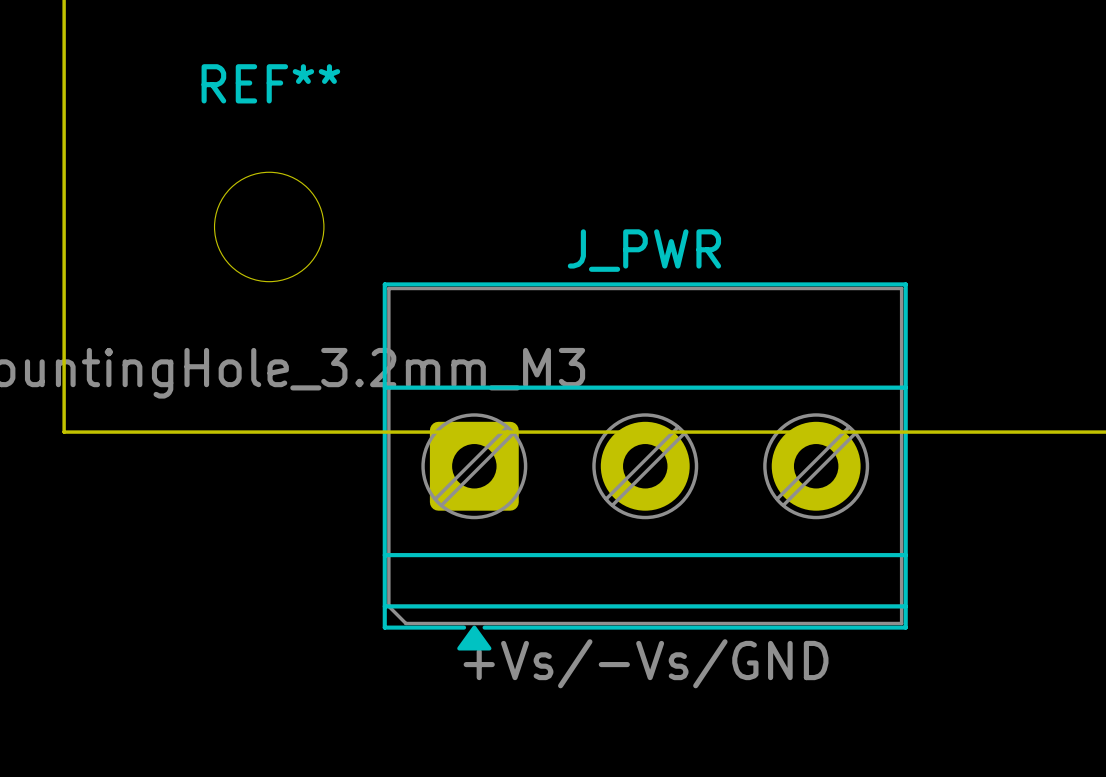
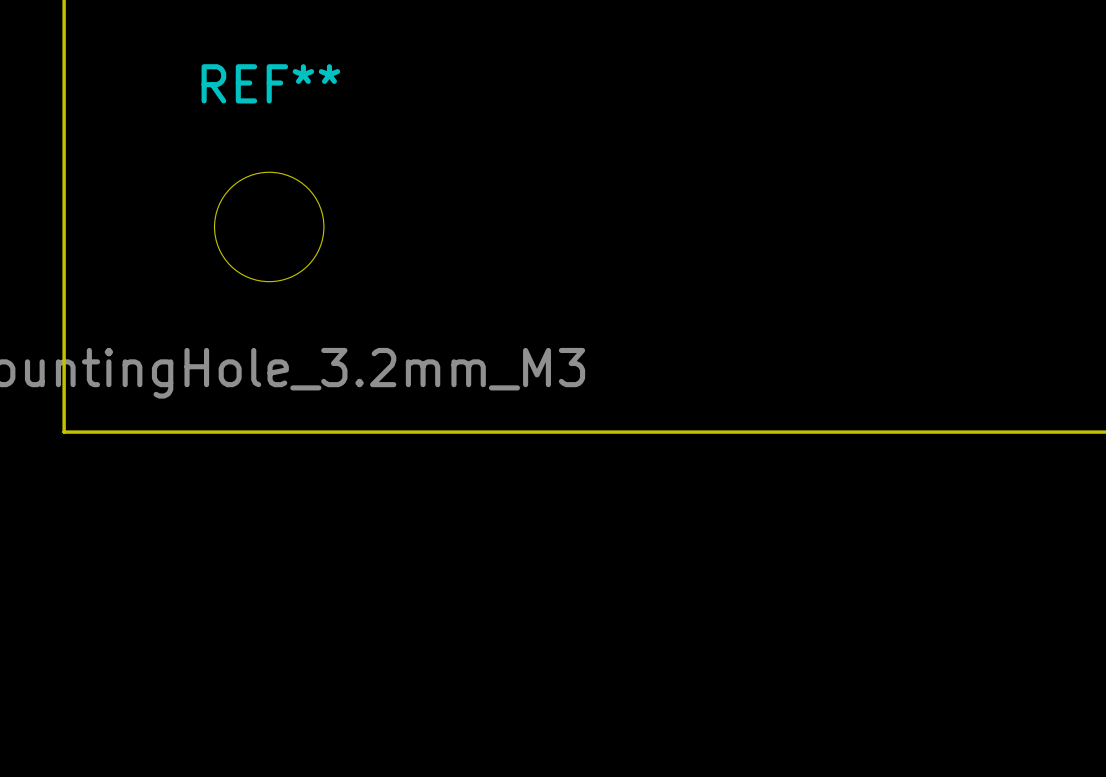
J_PWR: +Vs/-Vs/GND (645, 466) -> none

